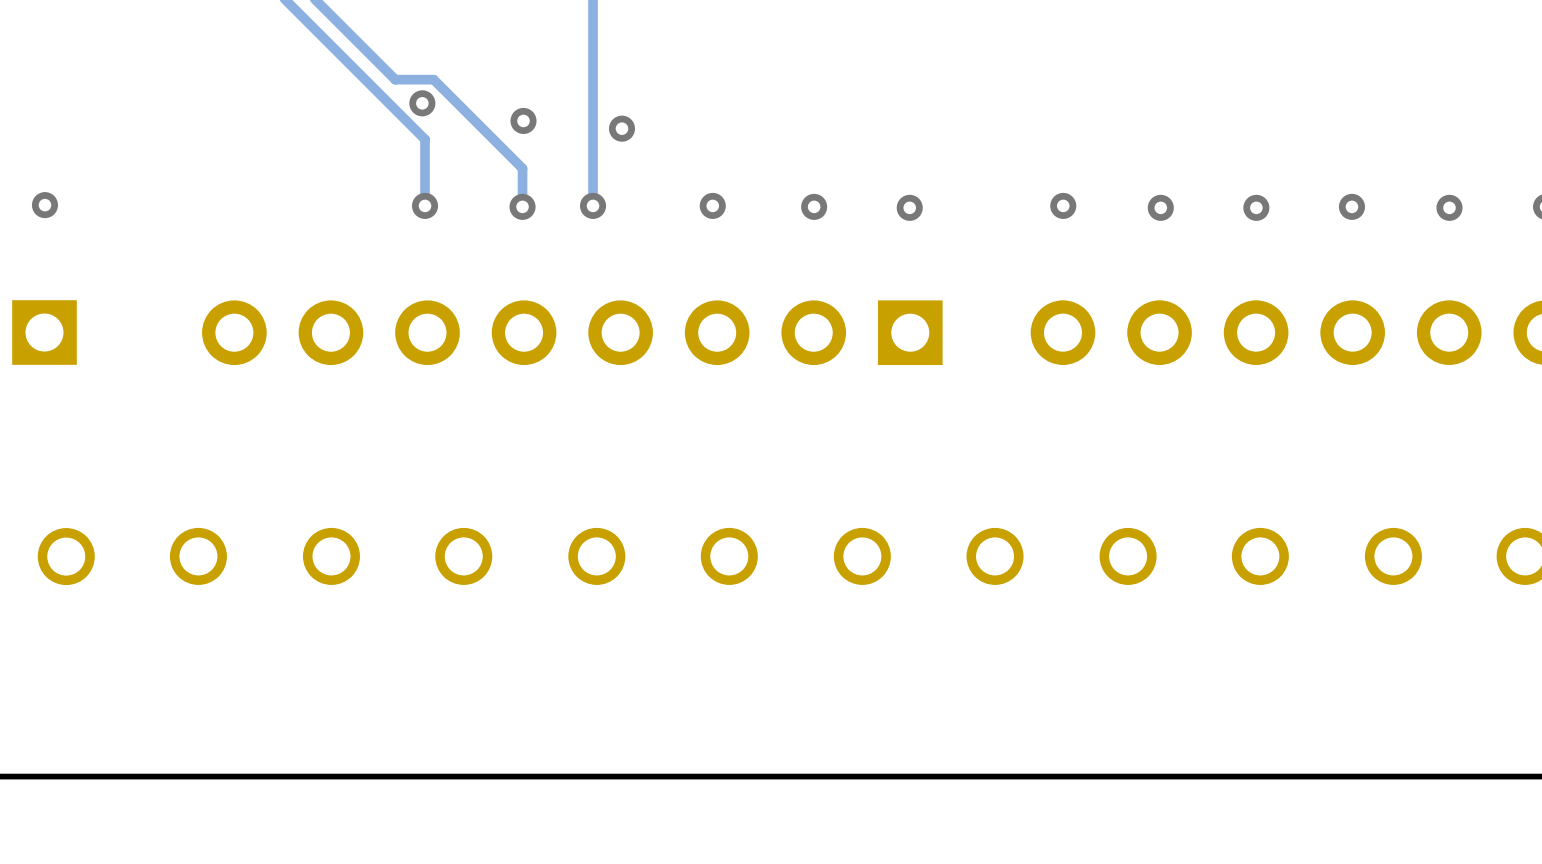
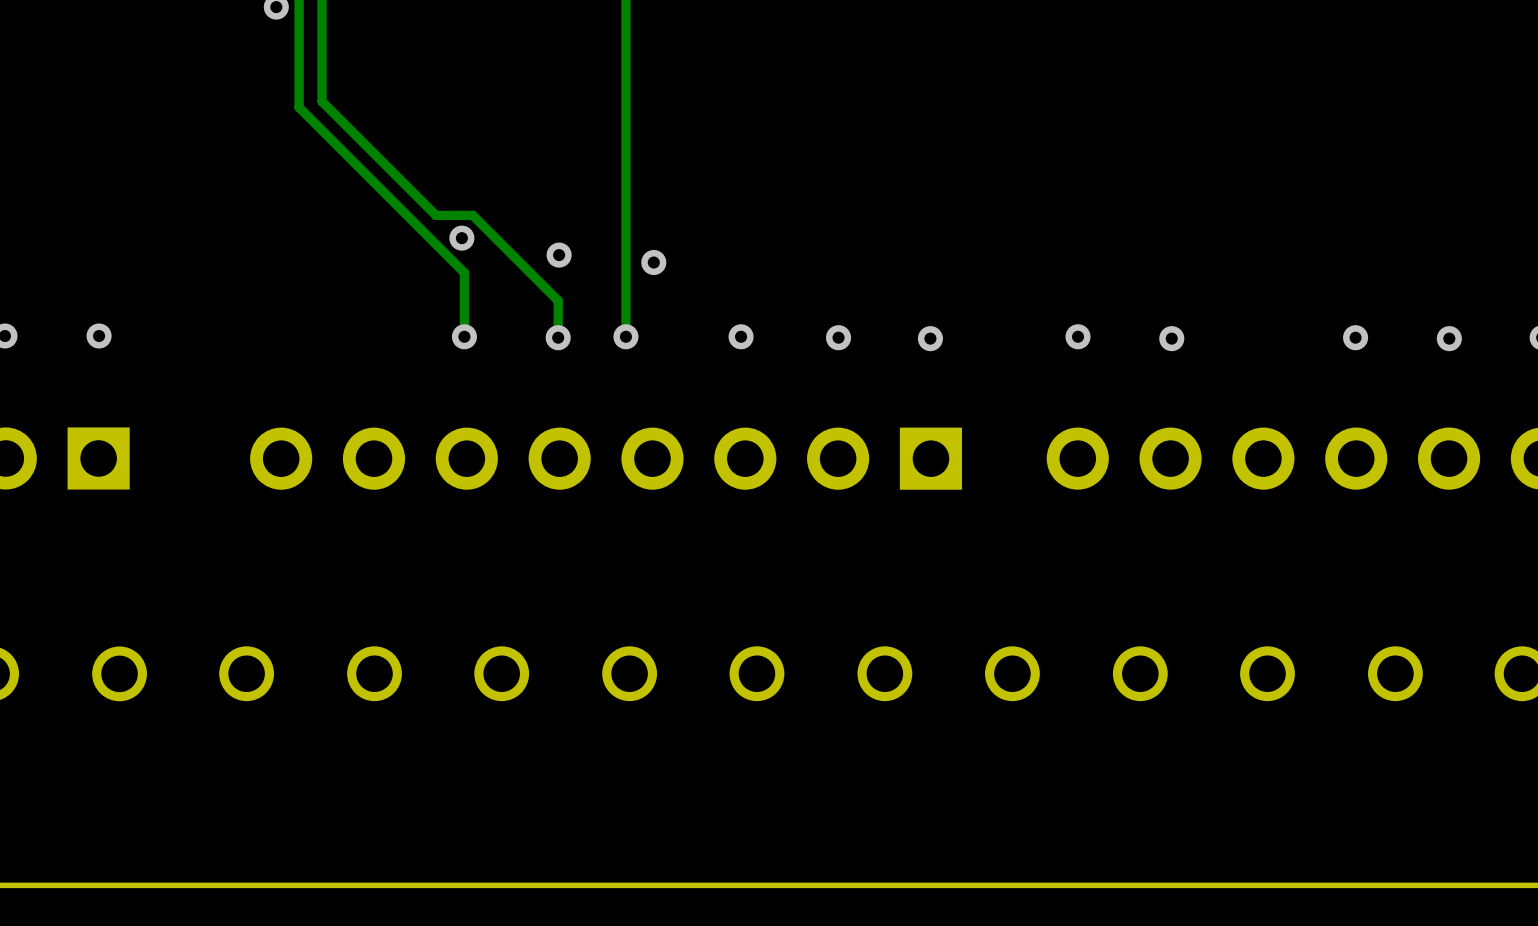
via: (1256, 207) -> none

